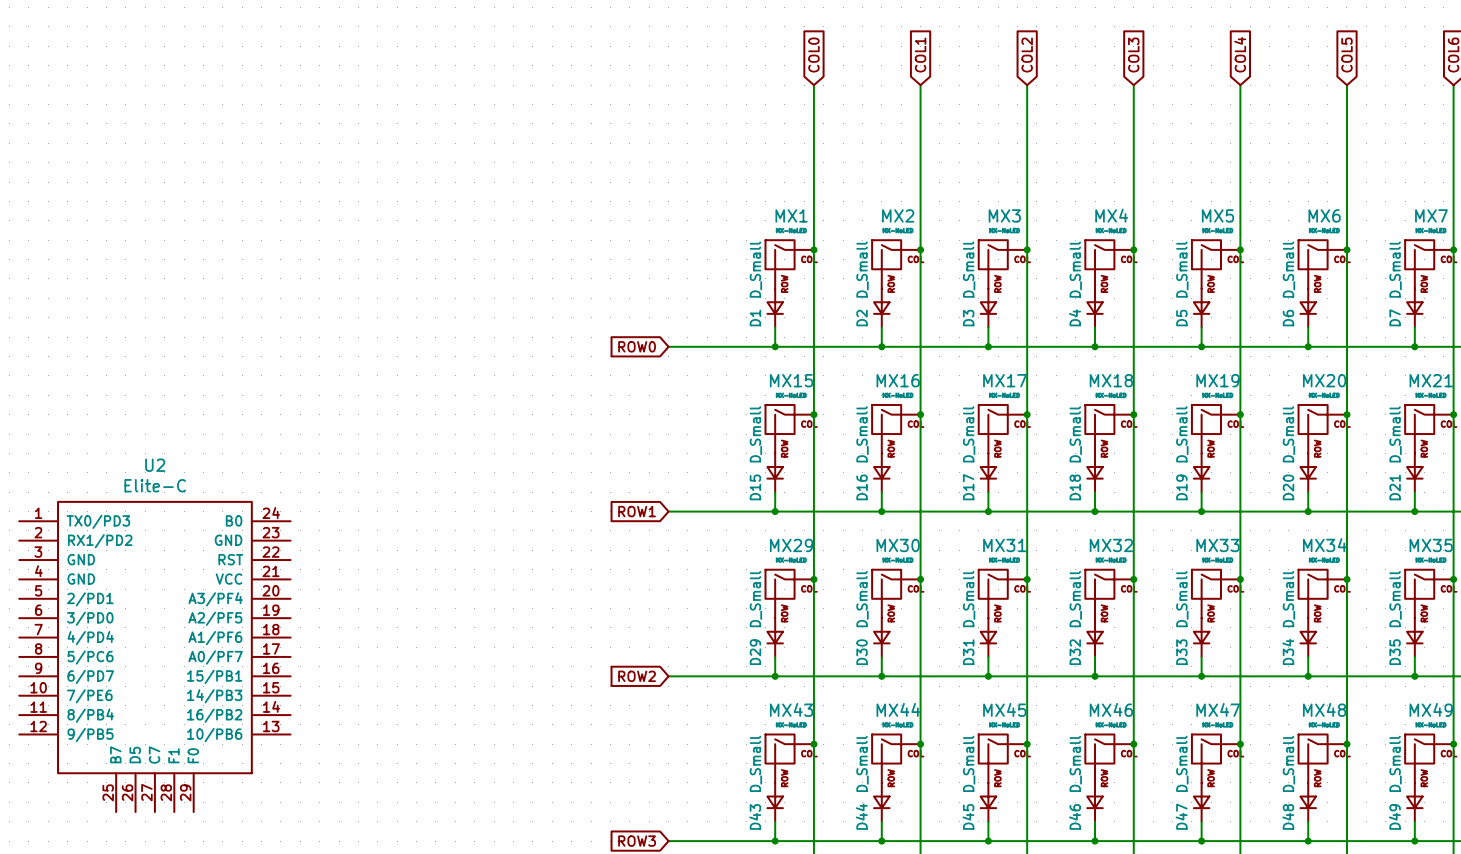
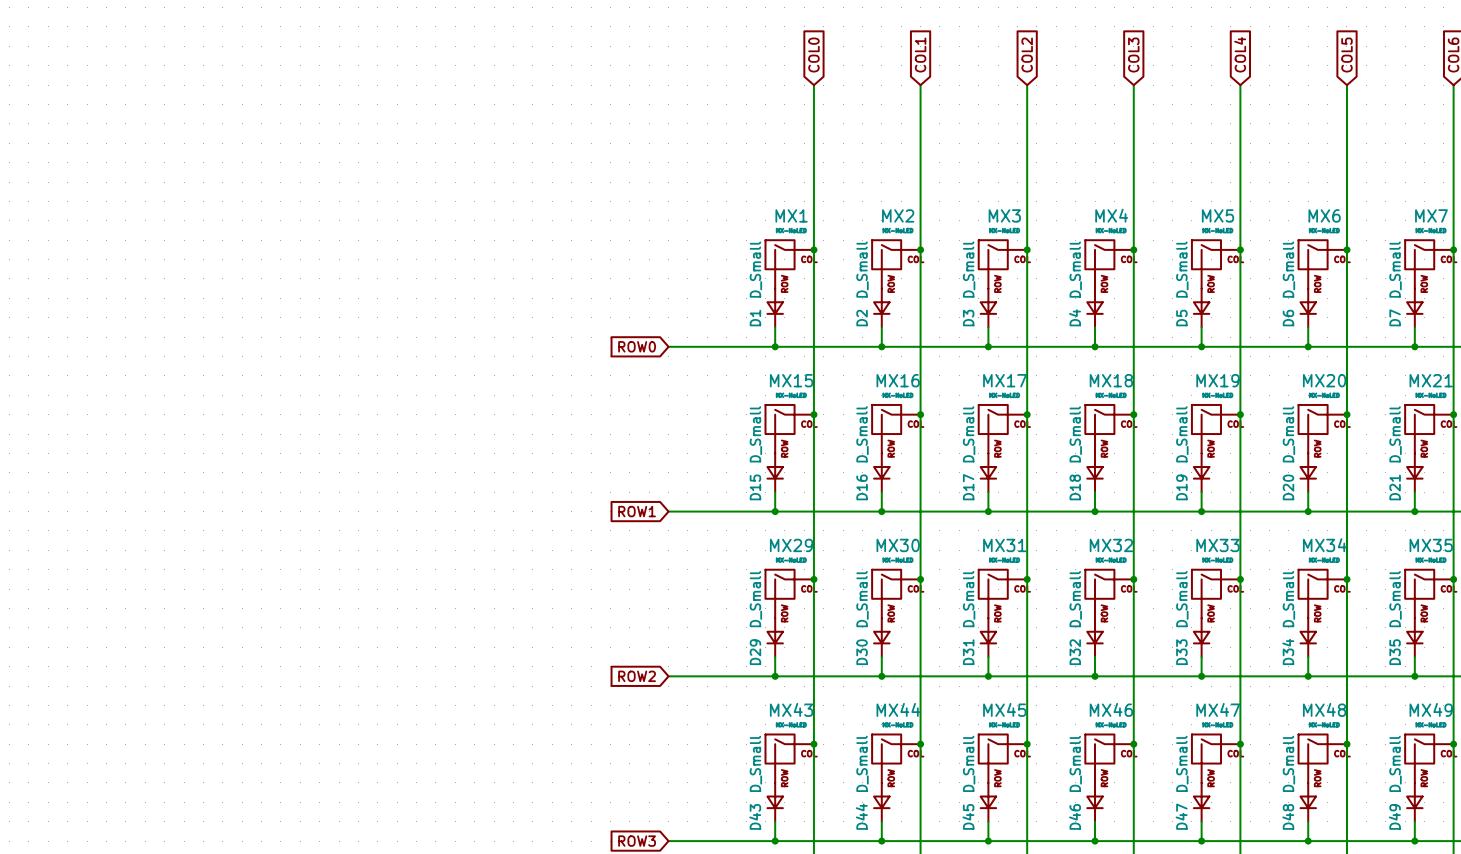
U2: Elite-C (154, 656) -> none

